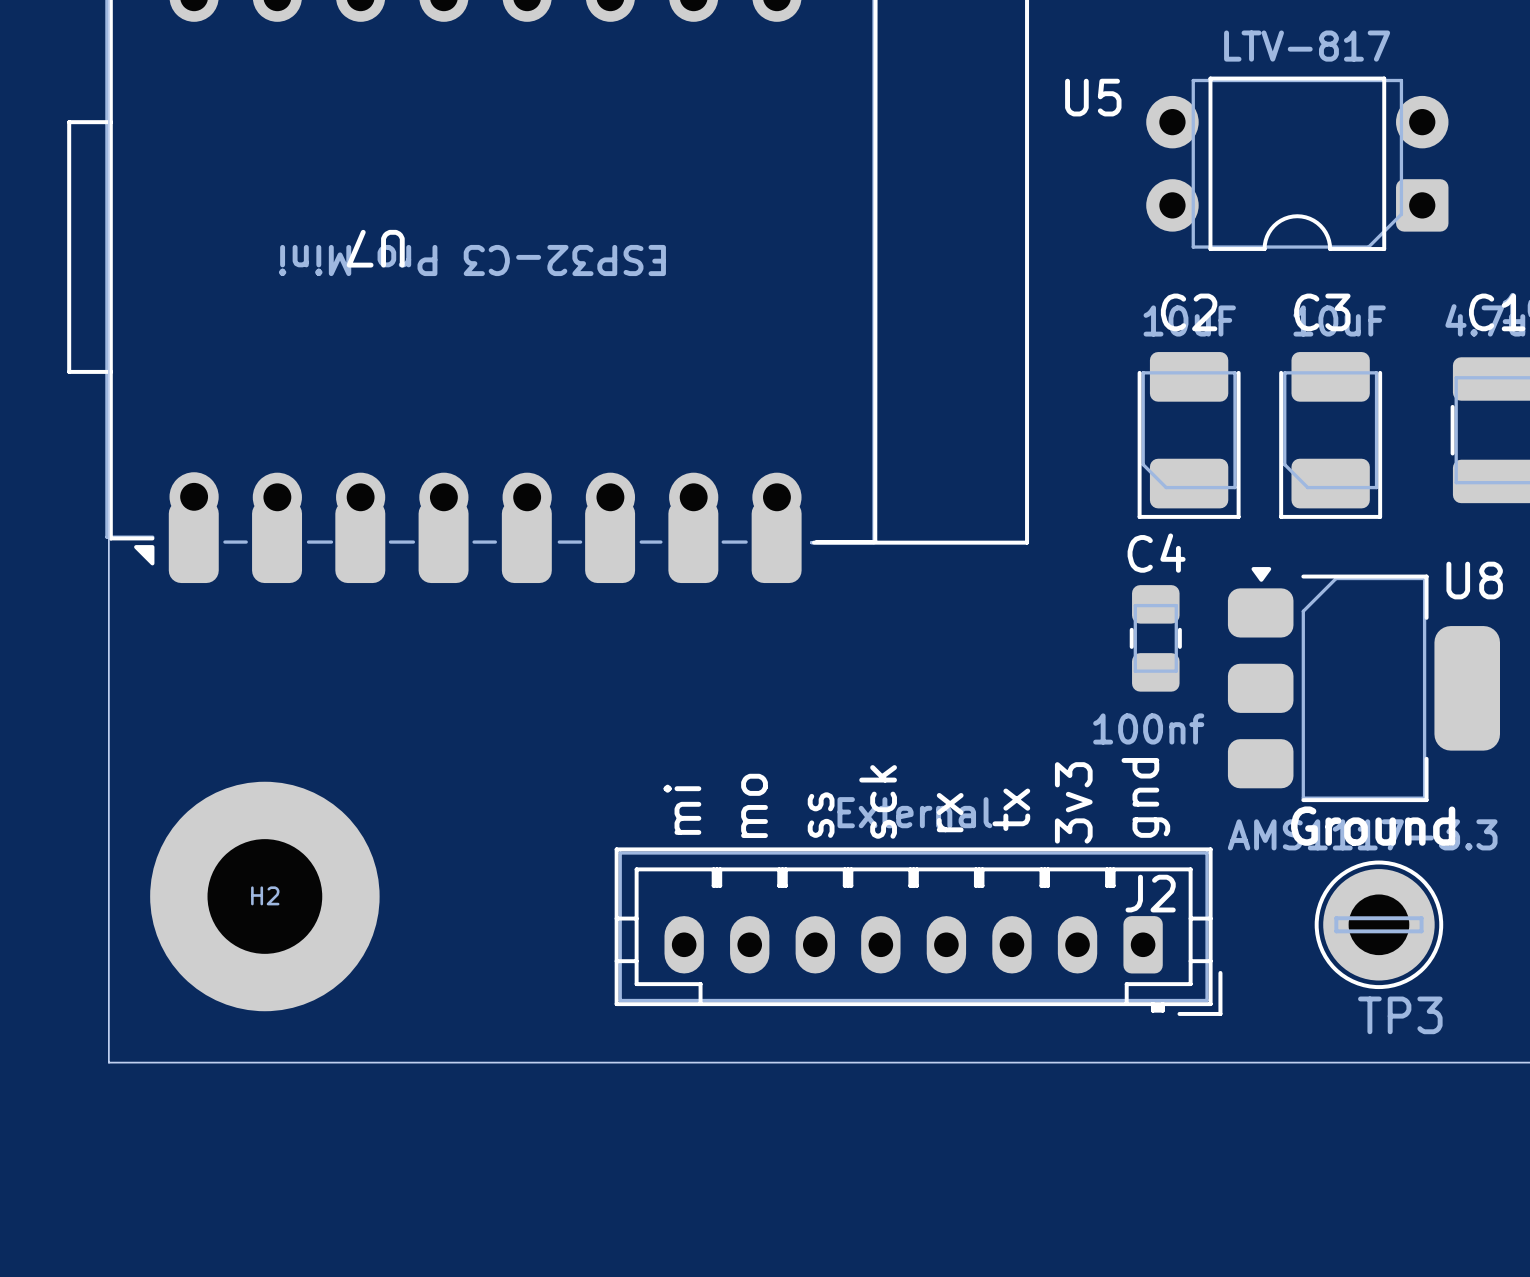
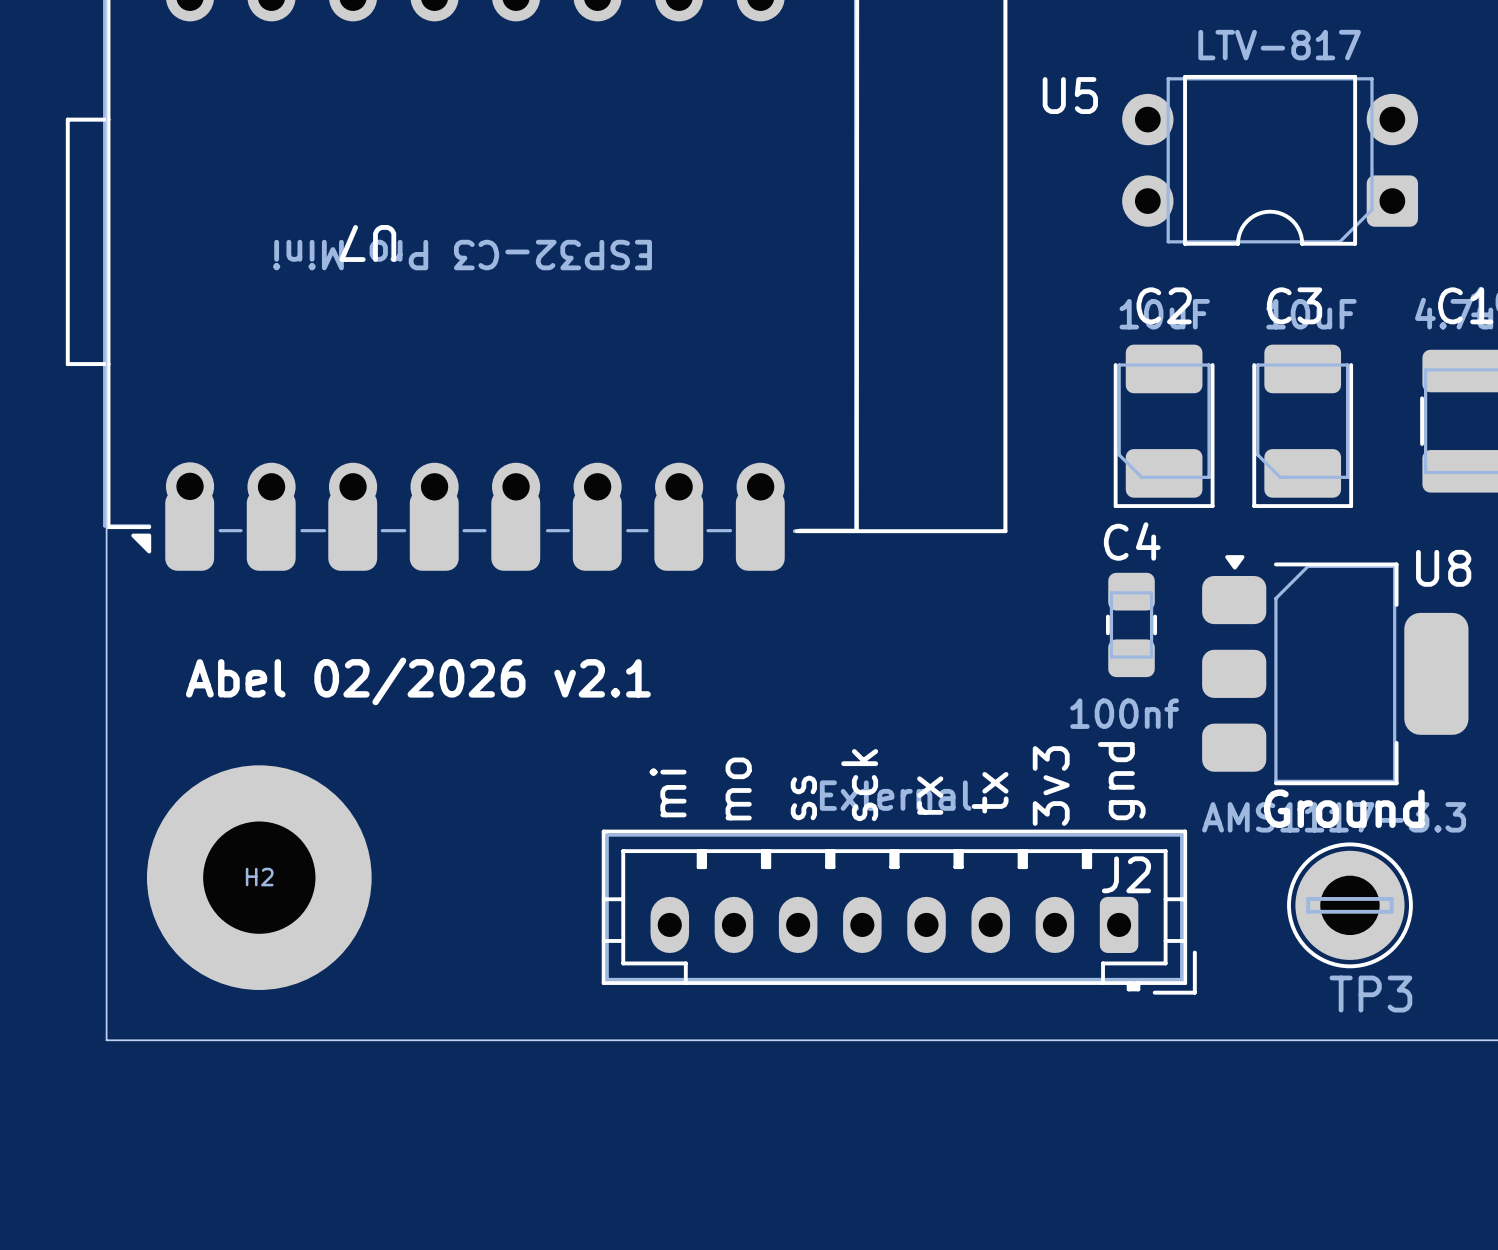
text: none -> Abel 02/2026 v2.1 (418, 681)

